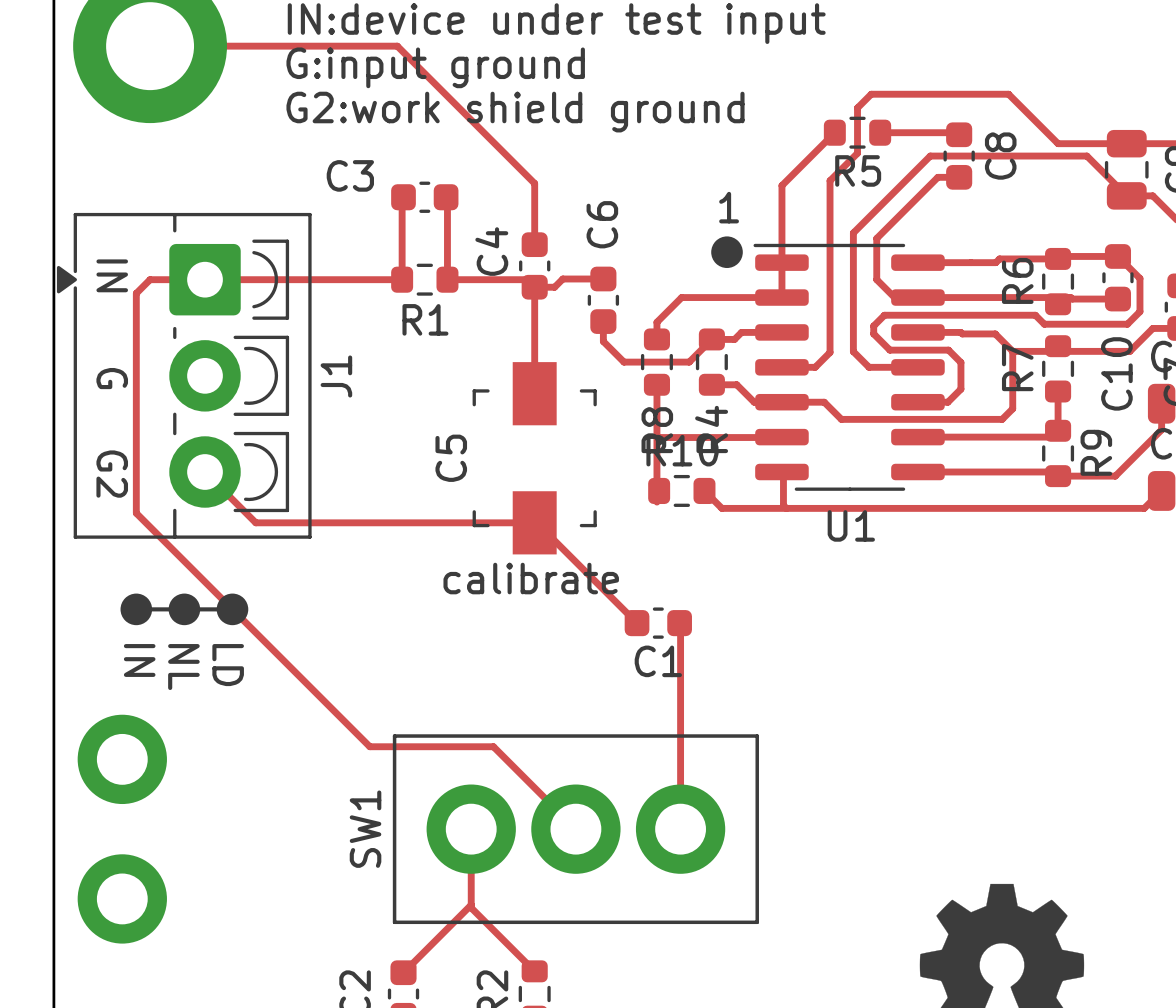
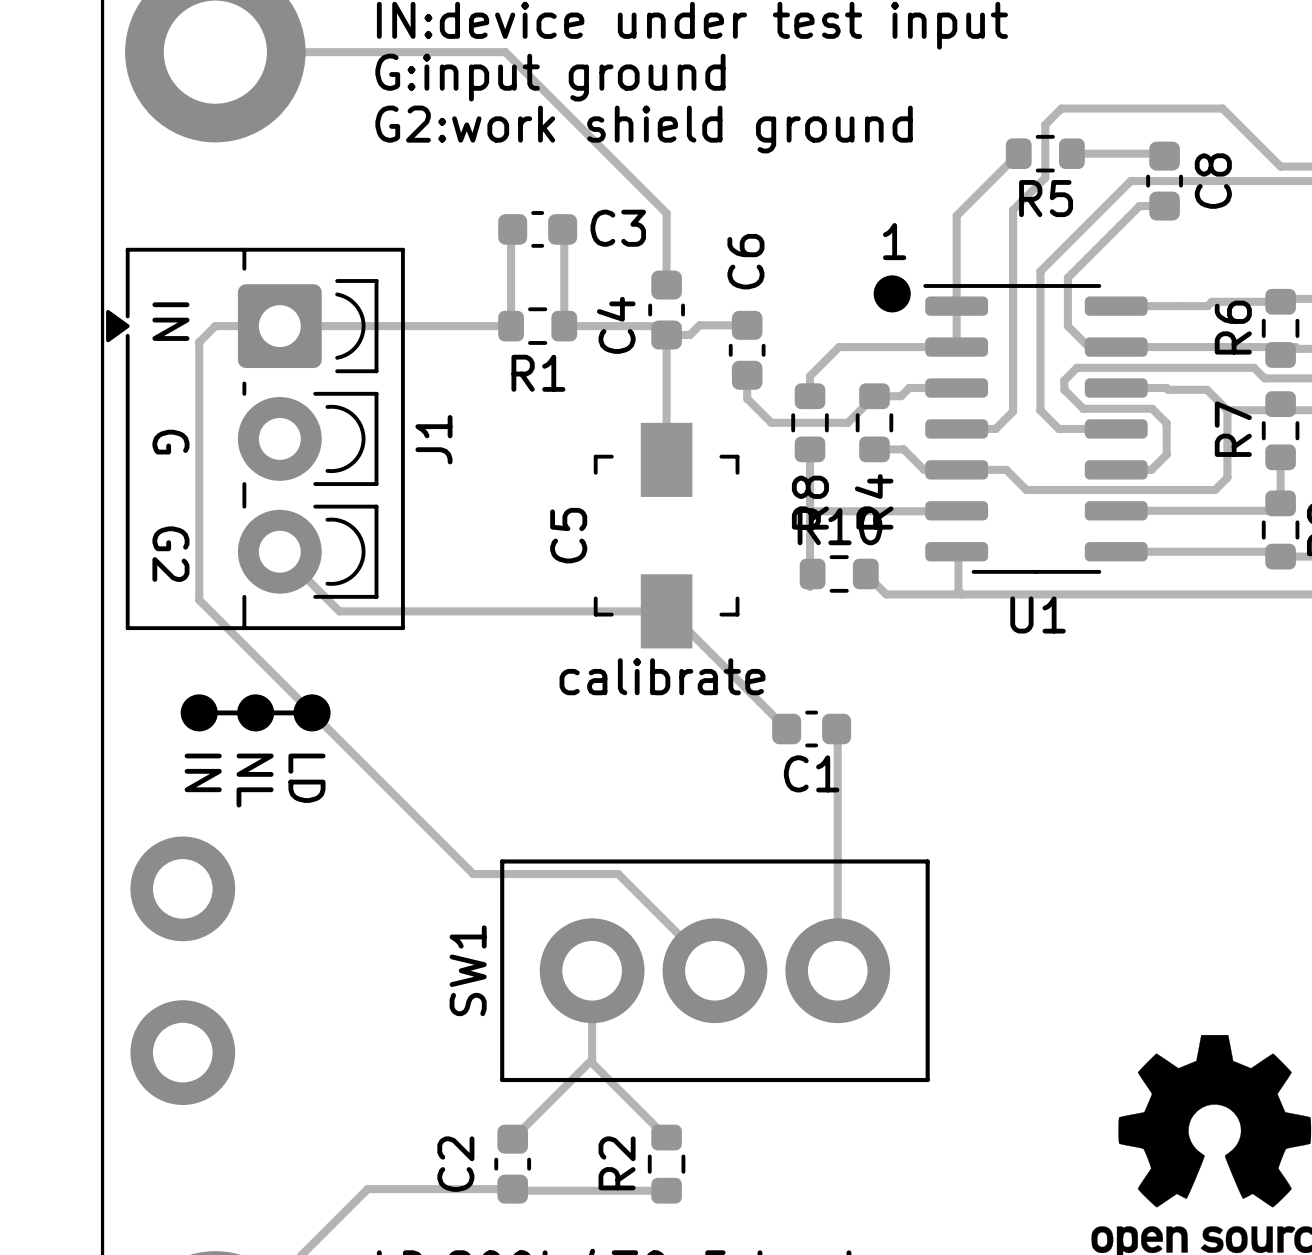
C3 name position: C3 (350, 175) -> C3 (618, 228)
C4 name position: C4 (491, 251) -> C4 (616, 325)

